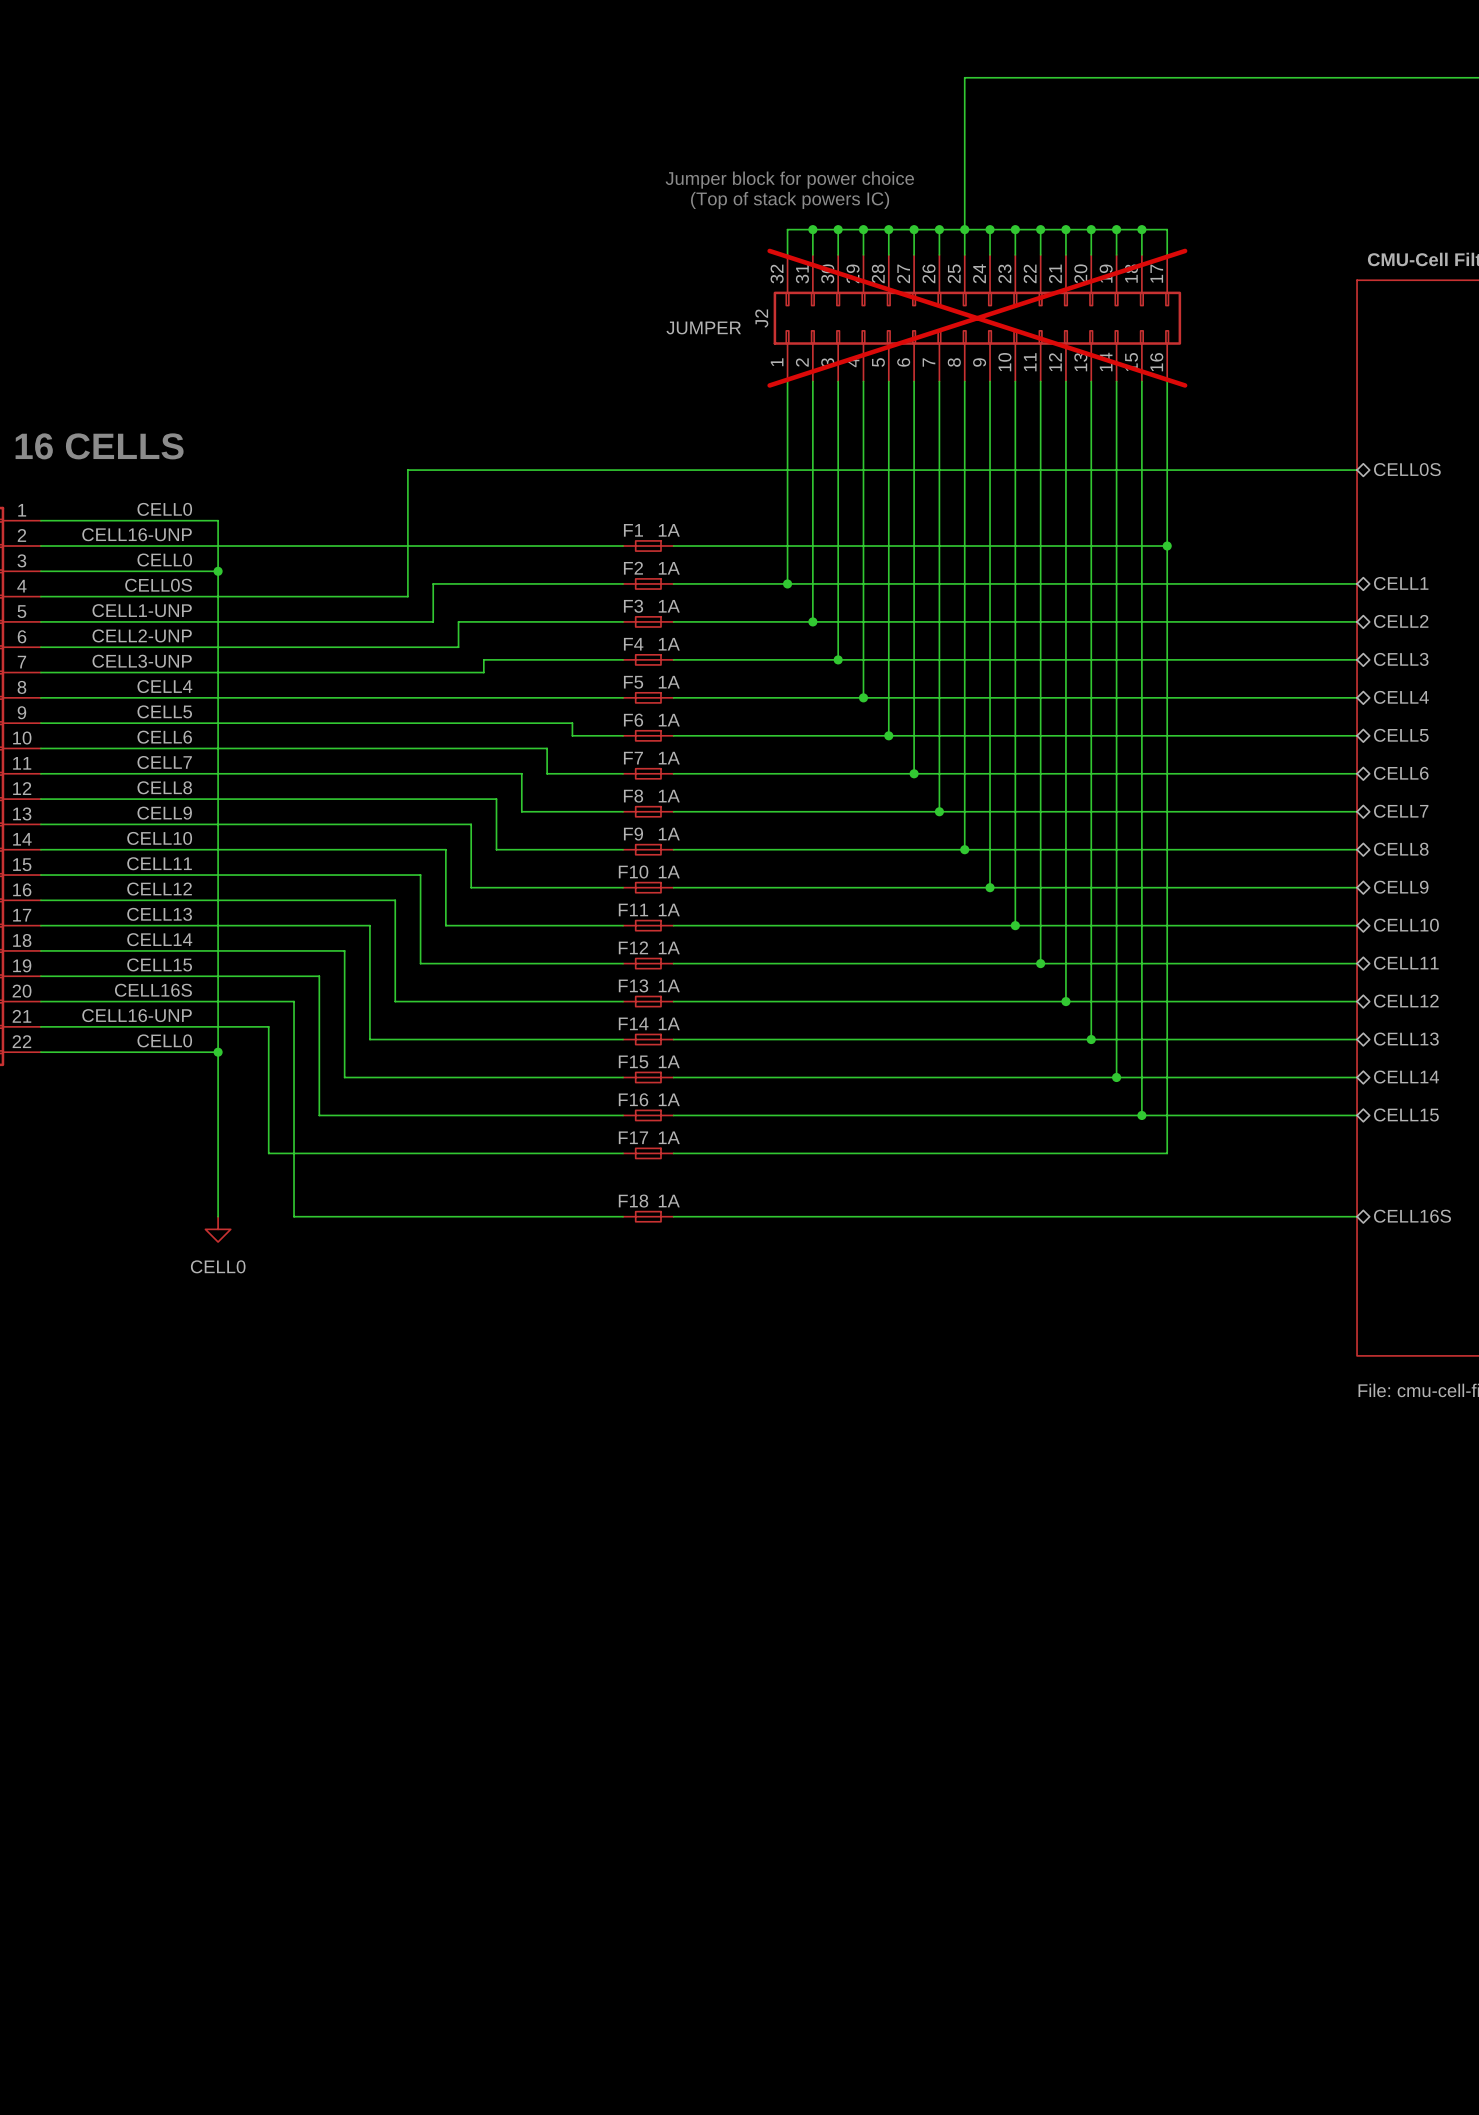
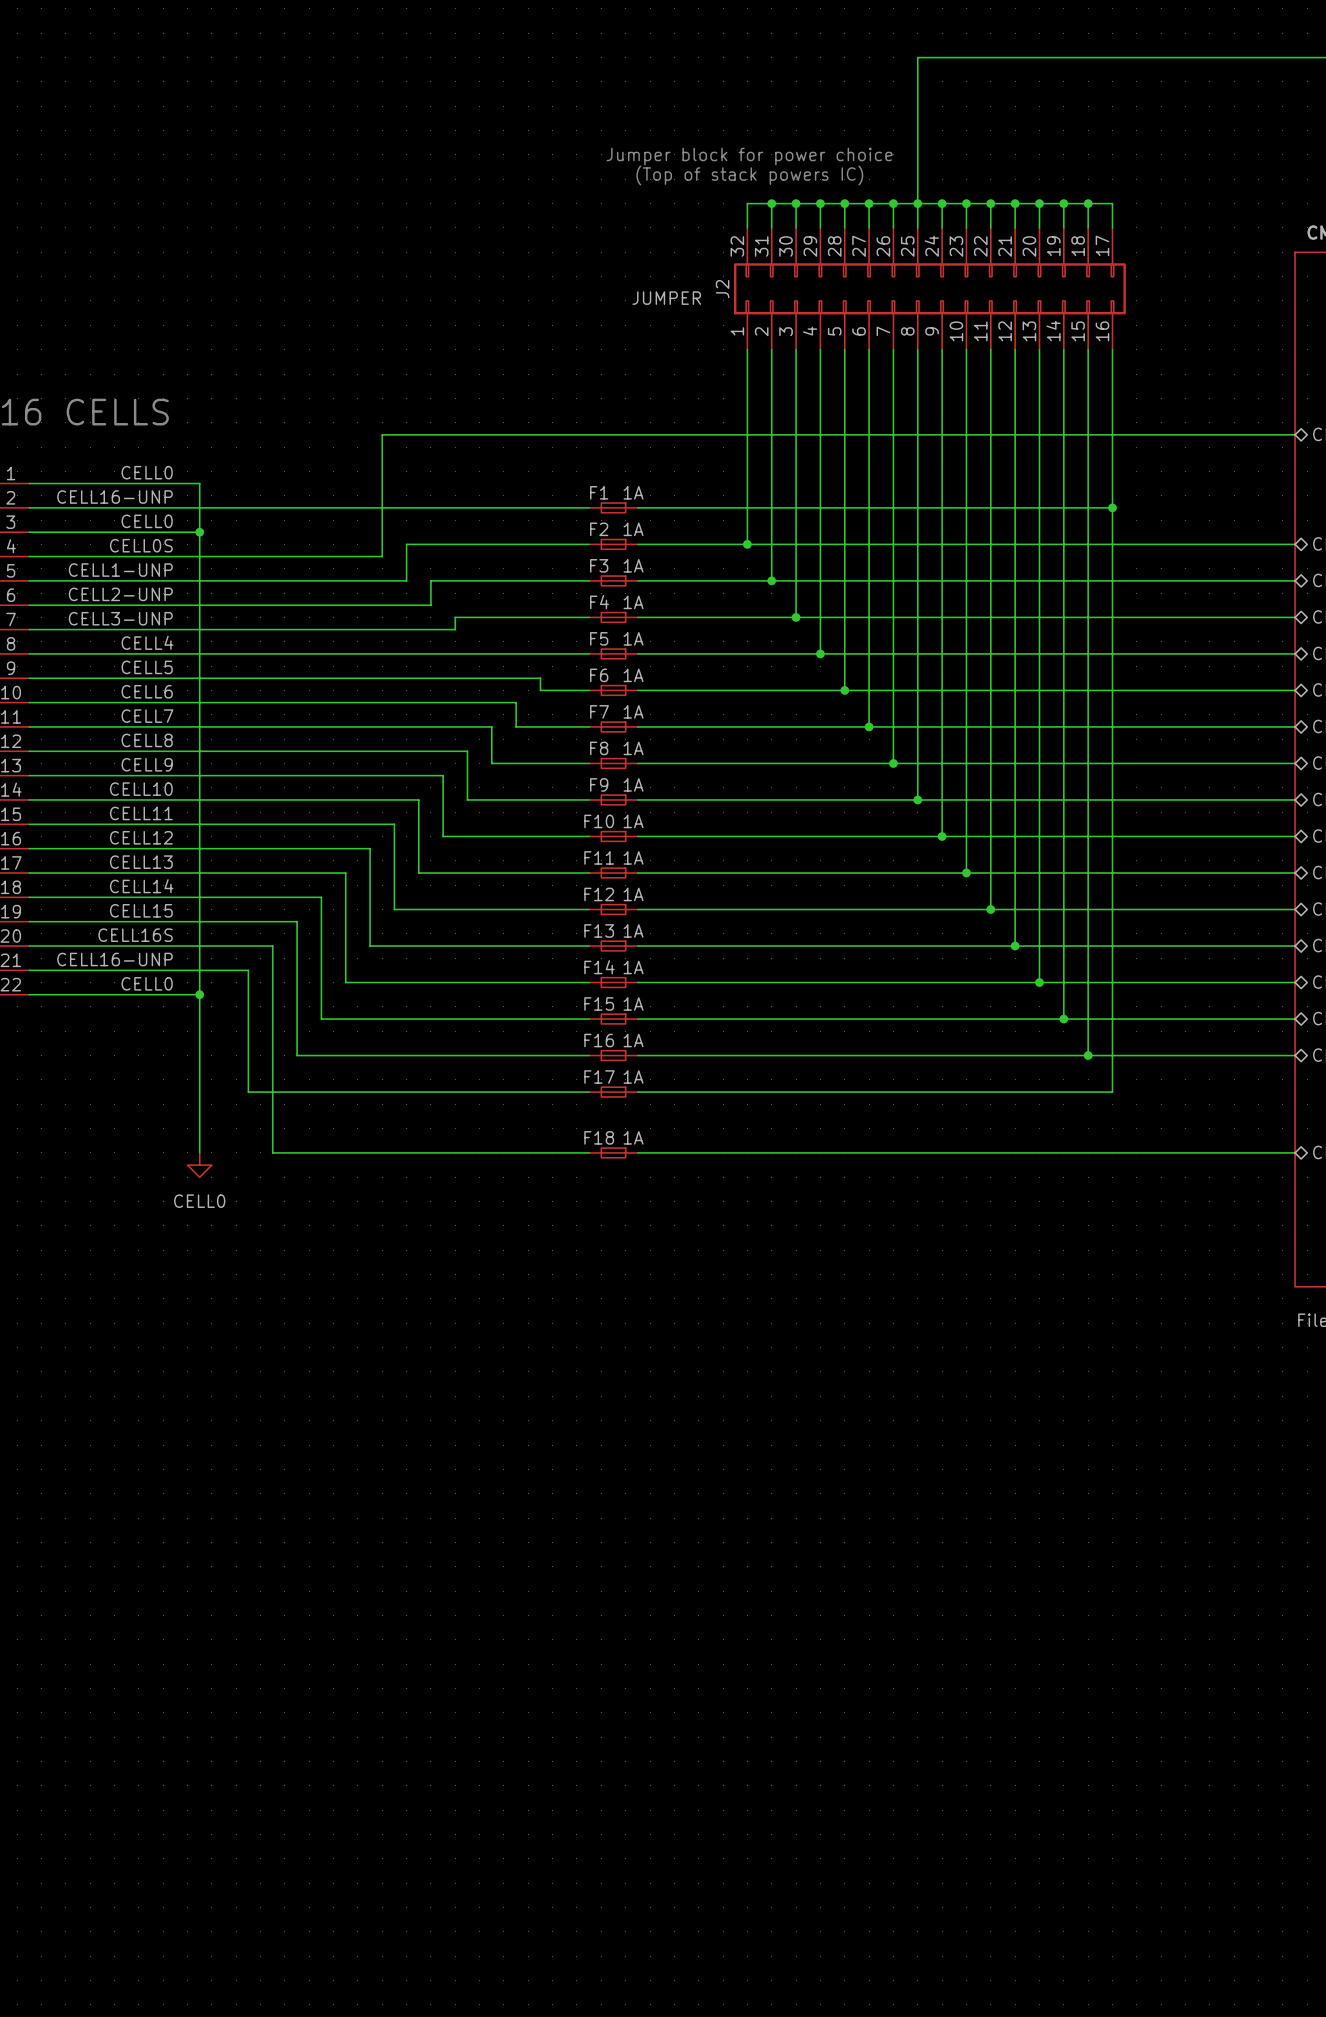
J2 do-not-place cross: (977, 318) -> none

